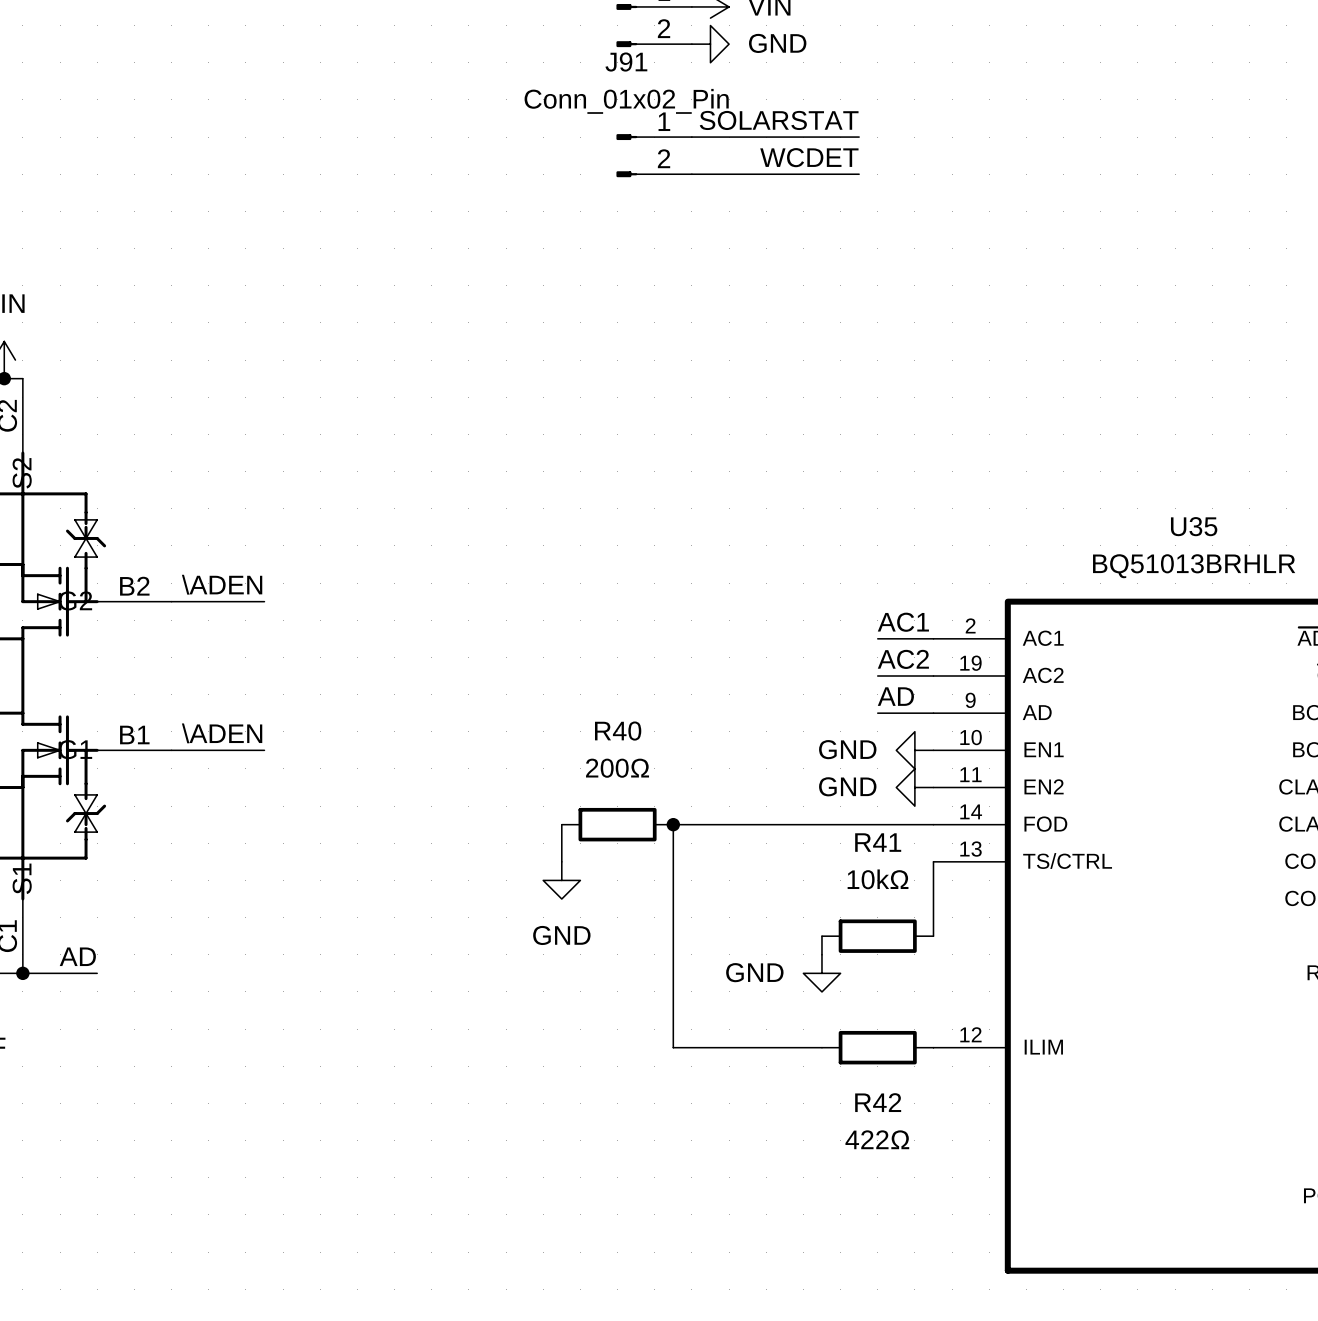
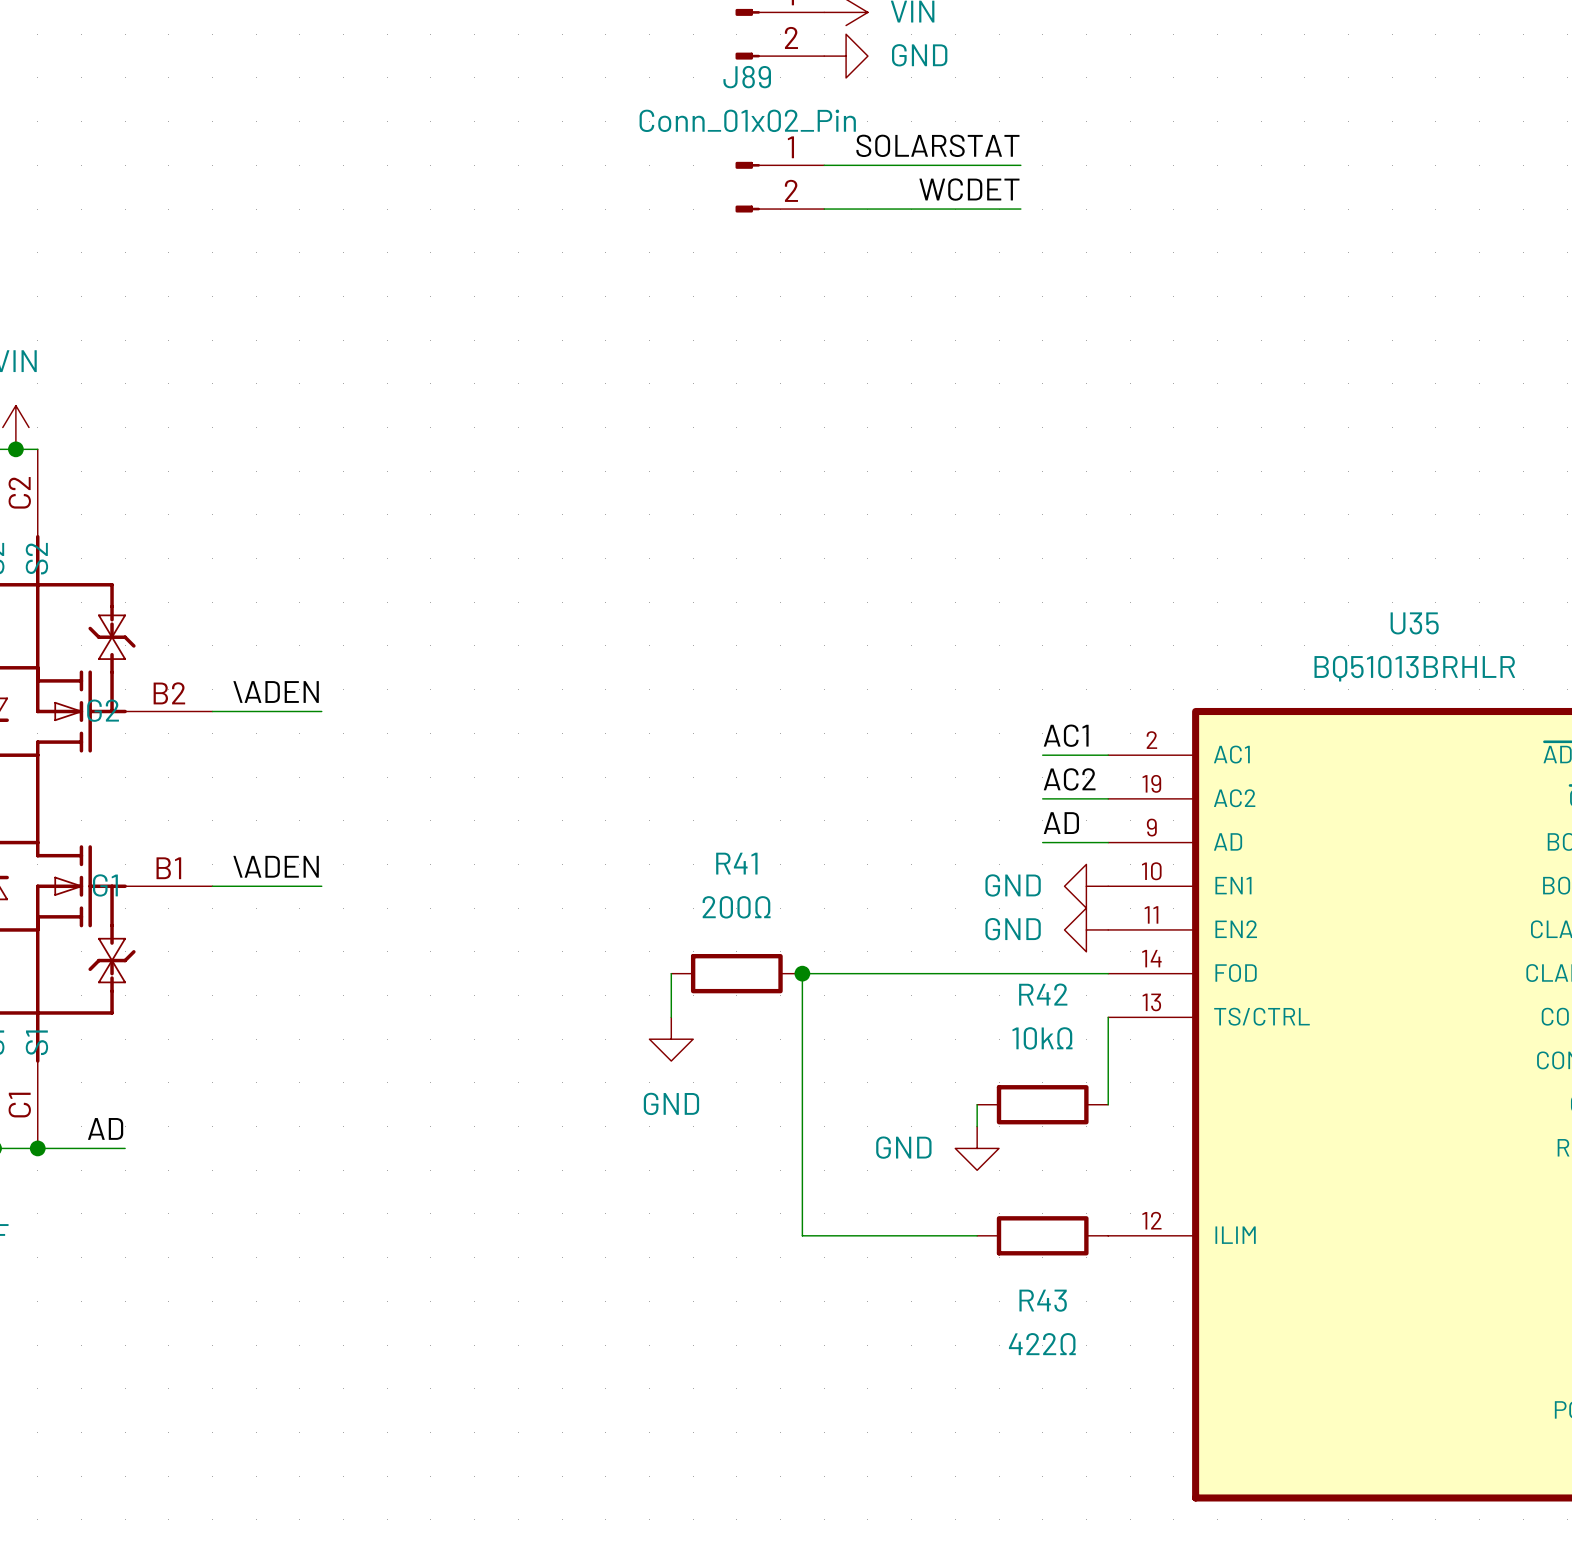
J91 name: J91 (626, 62) -> J89 (747, 77)
R40 name: R40 (618, 731) -> R41 (736, 863)
R41 name: R41 (878, 842) -> R42 (1043, 994)
R42 name: R42 (878, 1102) -> R43 (1043, 1300)

